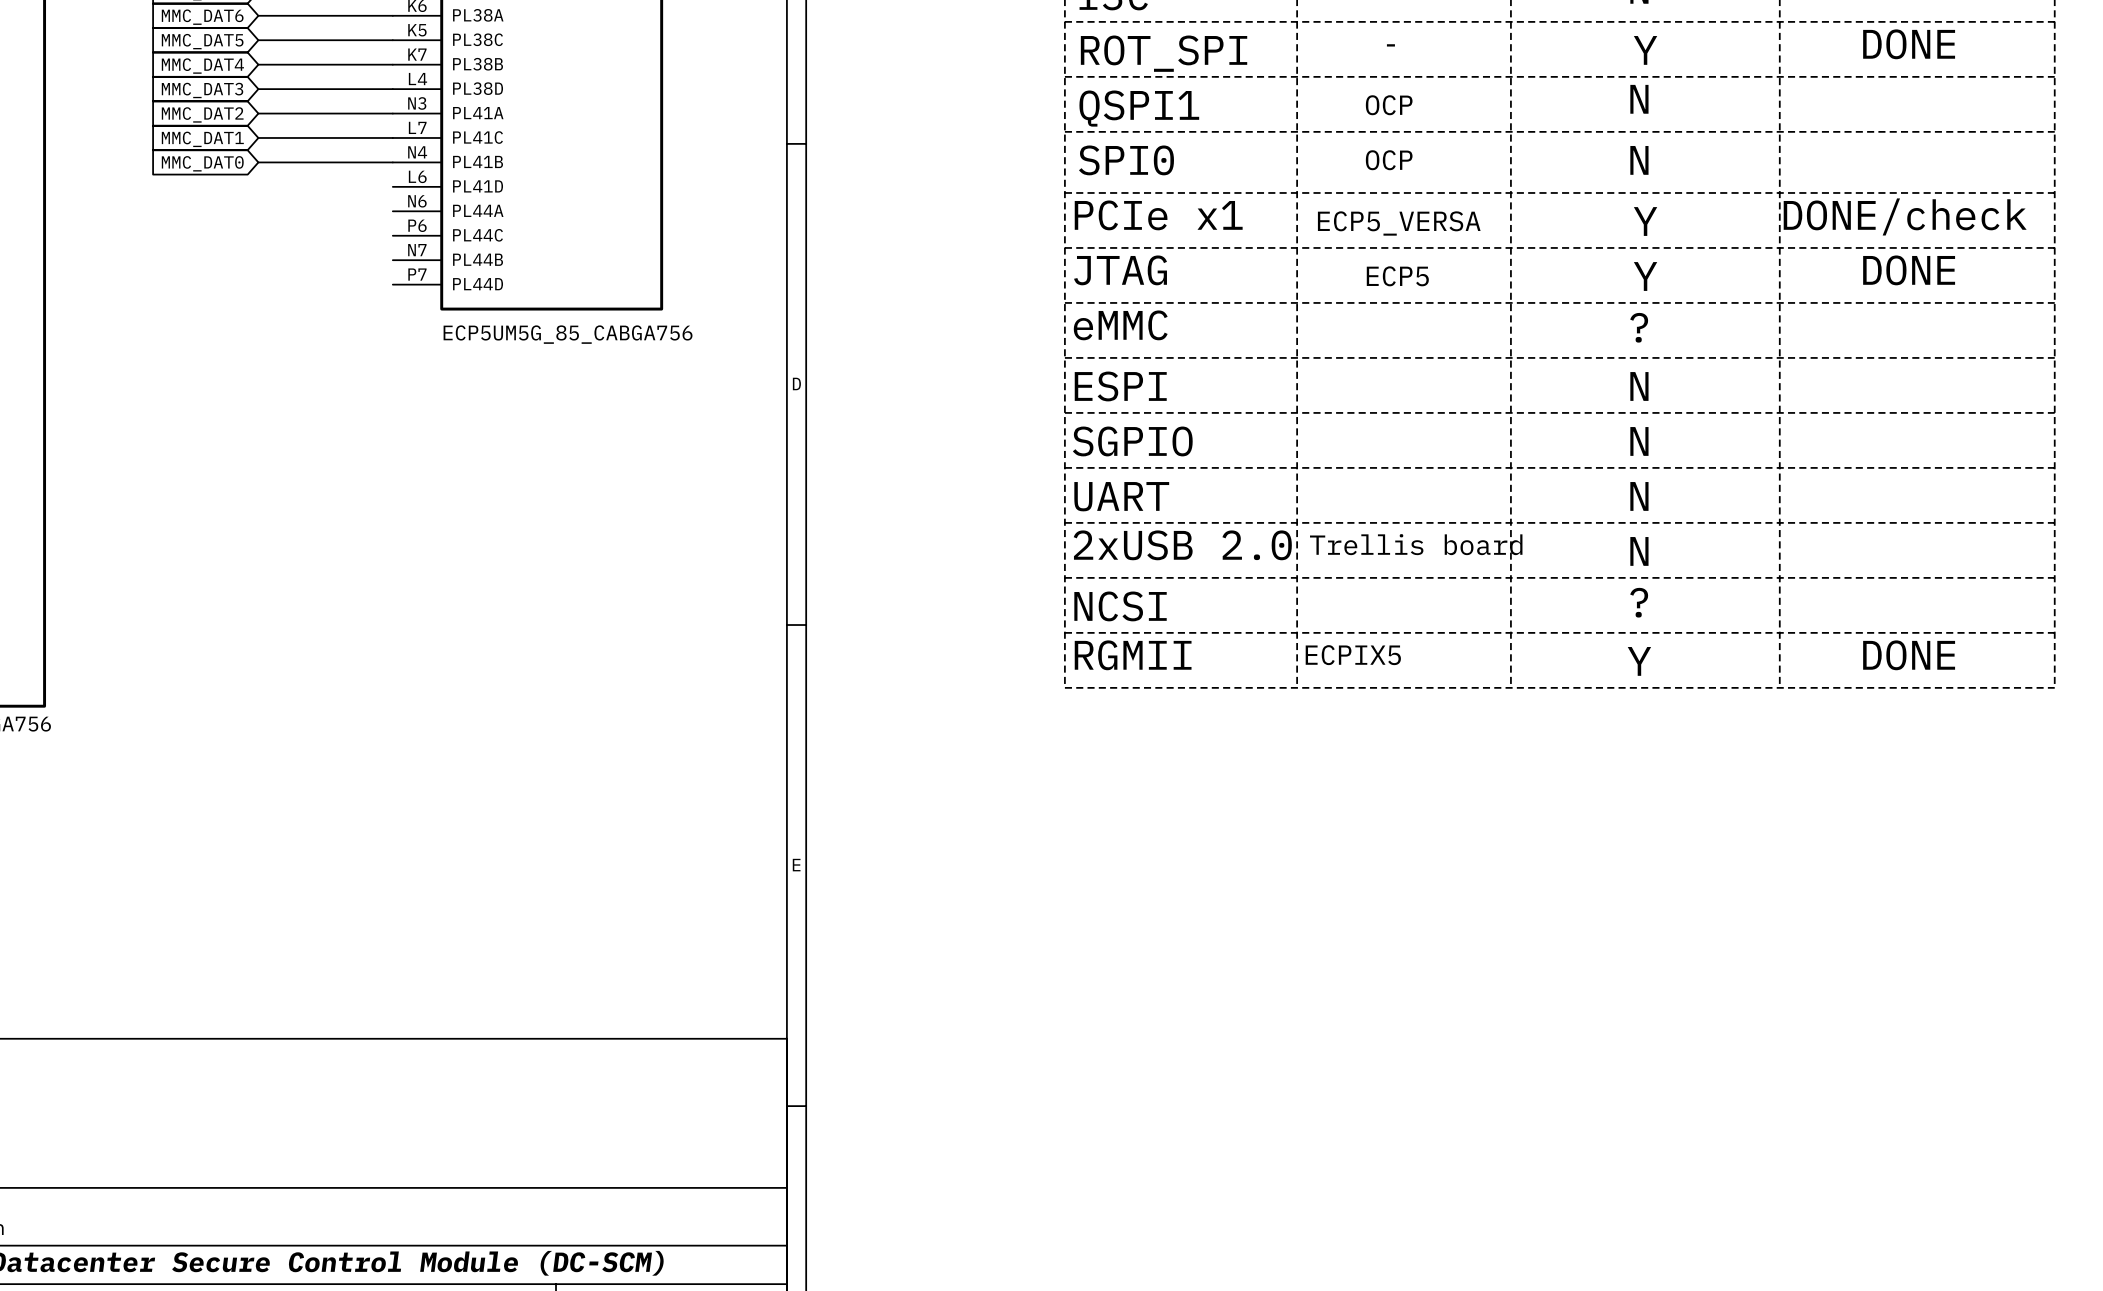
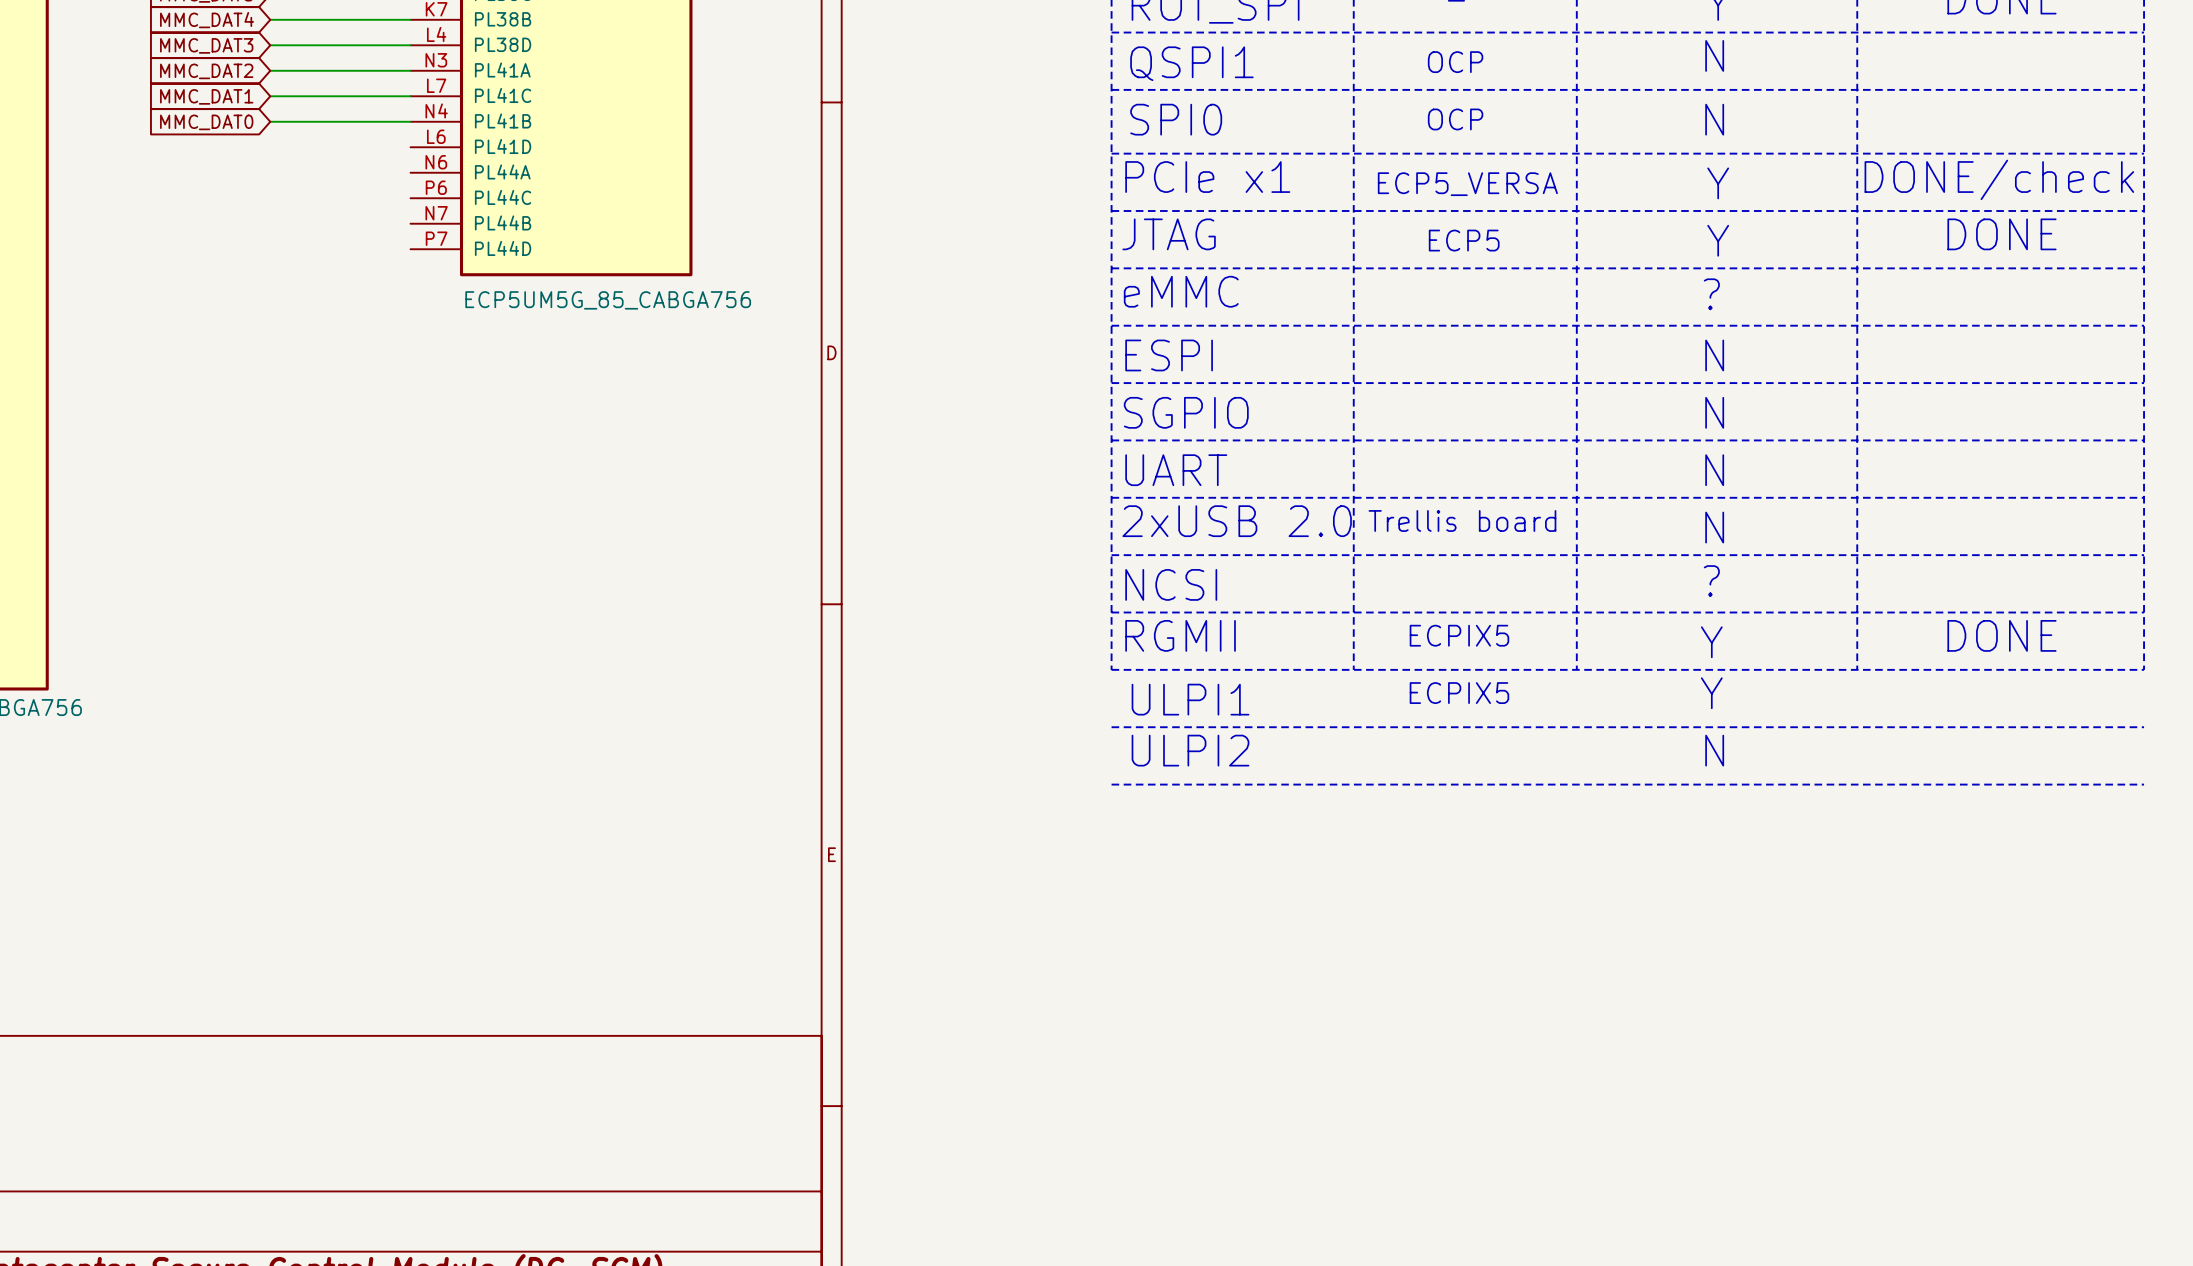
text position: ECPIX5 (1353, 655) -> ECPIX5 (1459, 635)
text: none -> ECPIX5 (1459, 693)
text: none -> Y (1711, 693)
text: none -> ULPI1 (1190, 699)
line: none -> (1111, 727) (2144, 727)
text: none -> ULPI2 (1190, 750)
text: none -> N (1714, 750)
line: none -> (1111, 784) (2144, 784)

